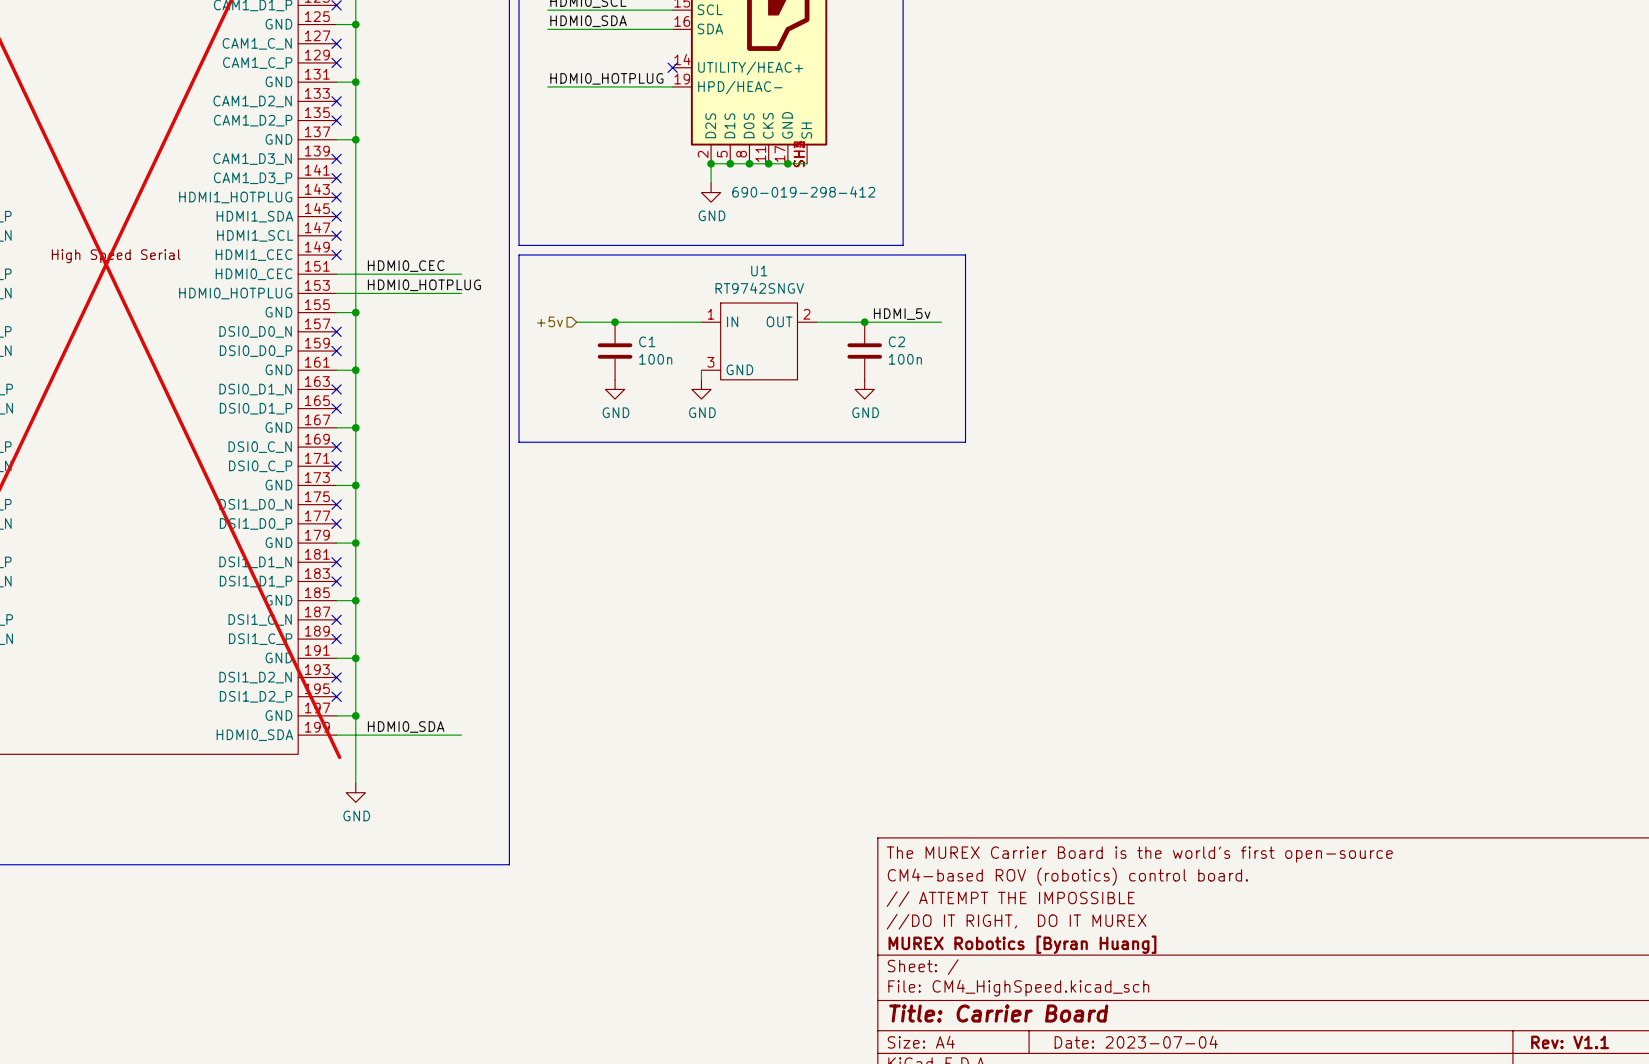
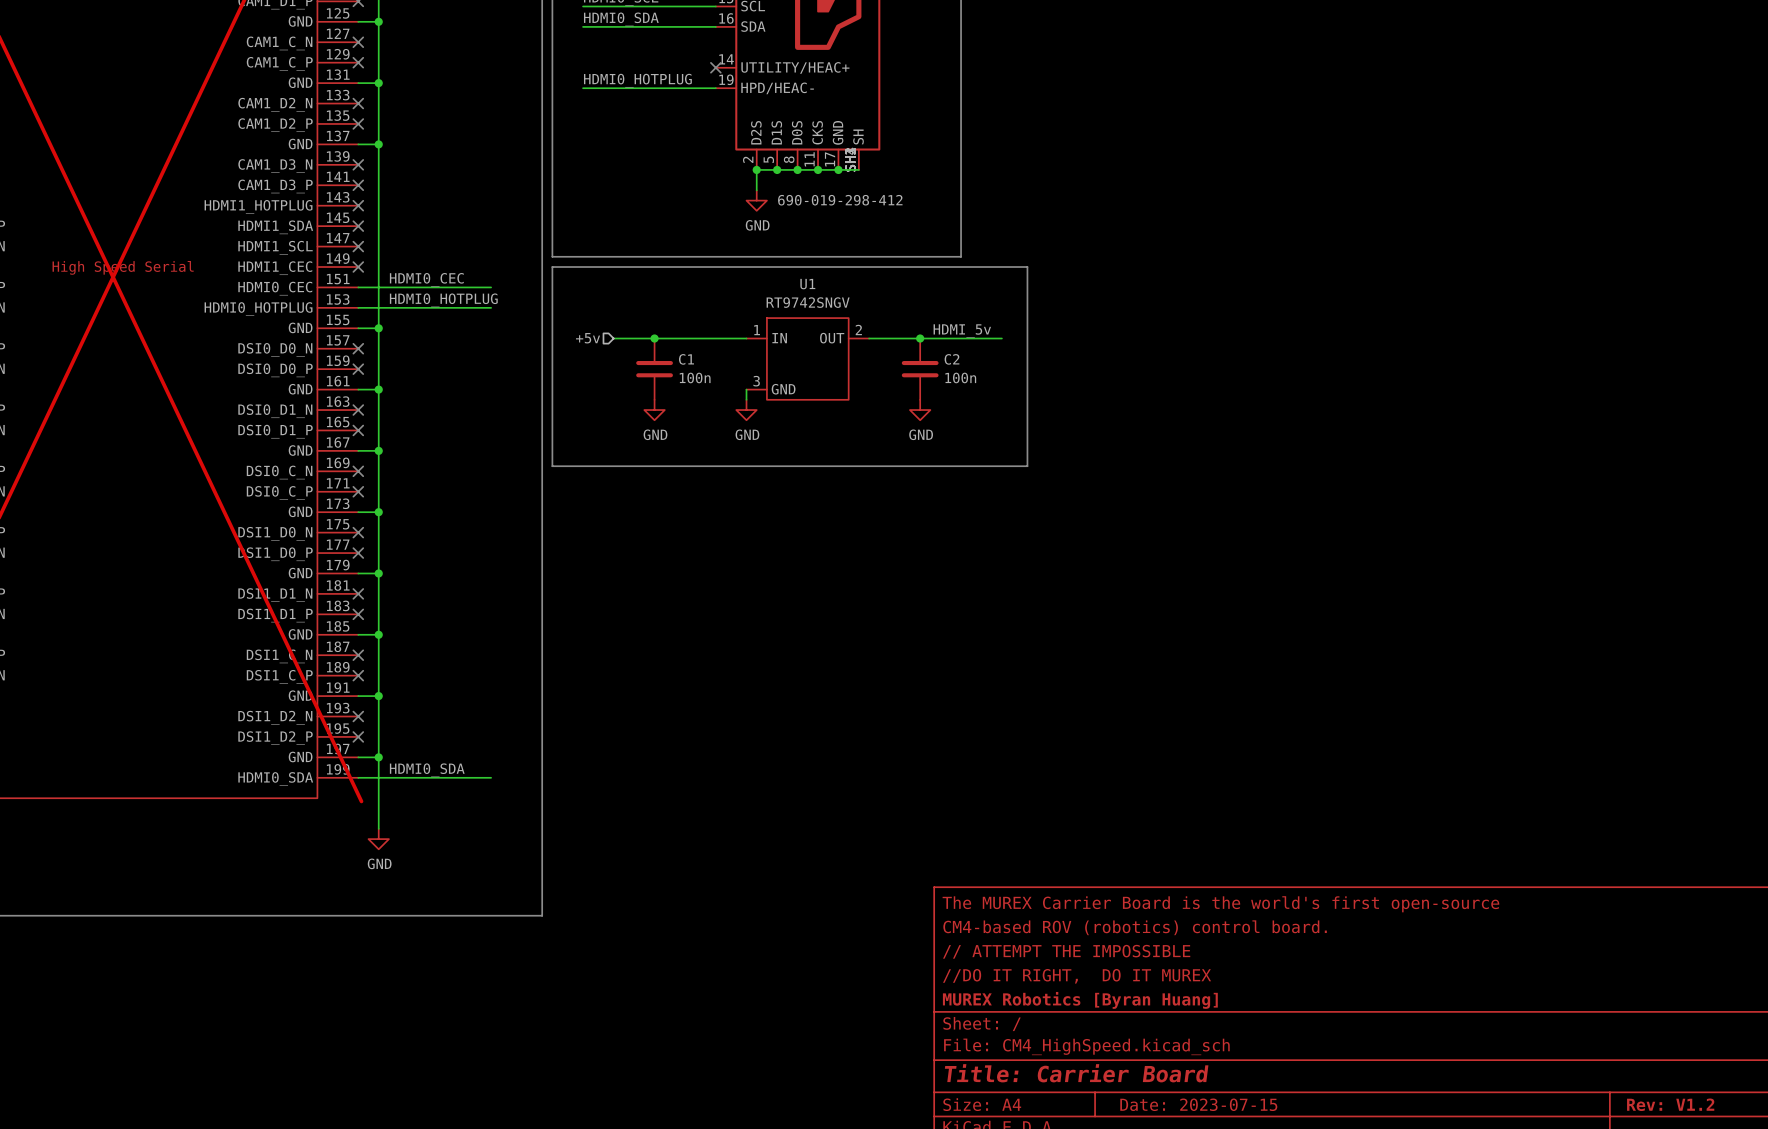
title block: Date: 2023-07-04 (1136, 1042) -> Date: 2023-07-15 (1198, 1104)
title block: Rev: V1.1 (1570, 1042) -> Rev: V1.2 (1670, 1104)

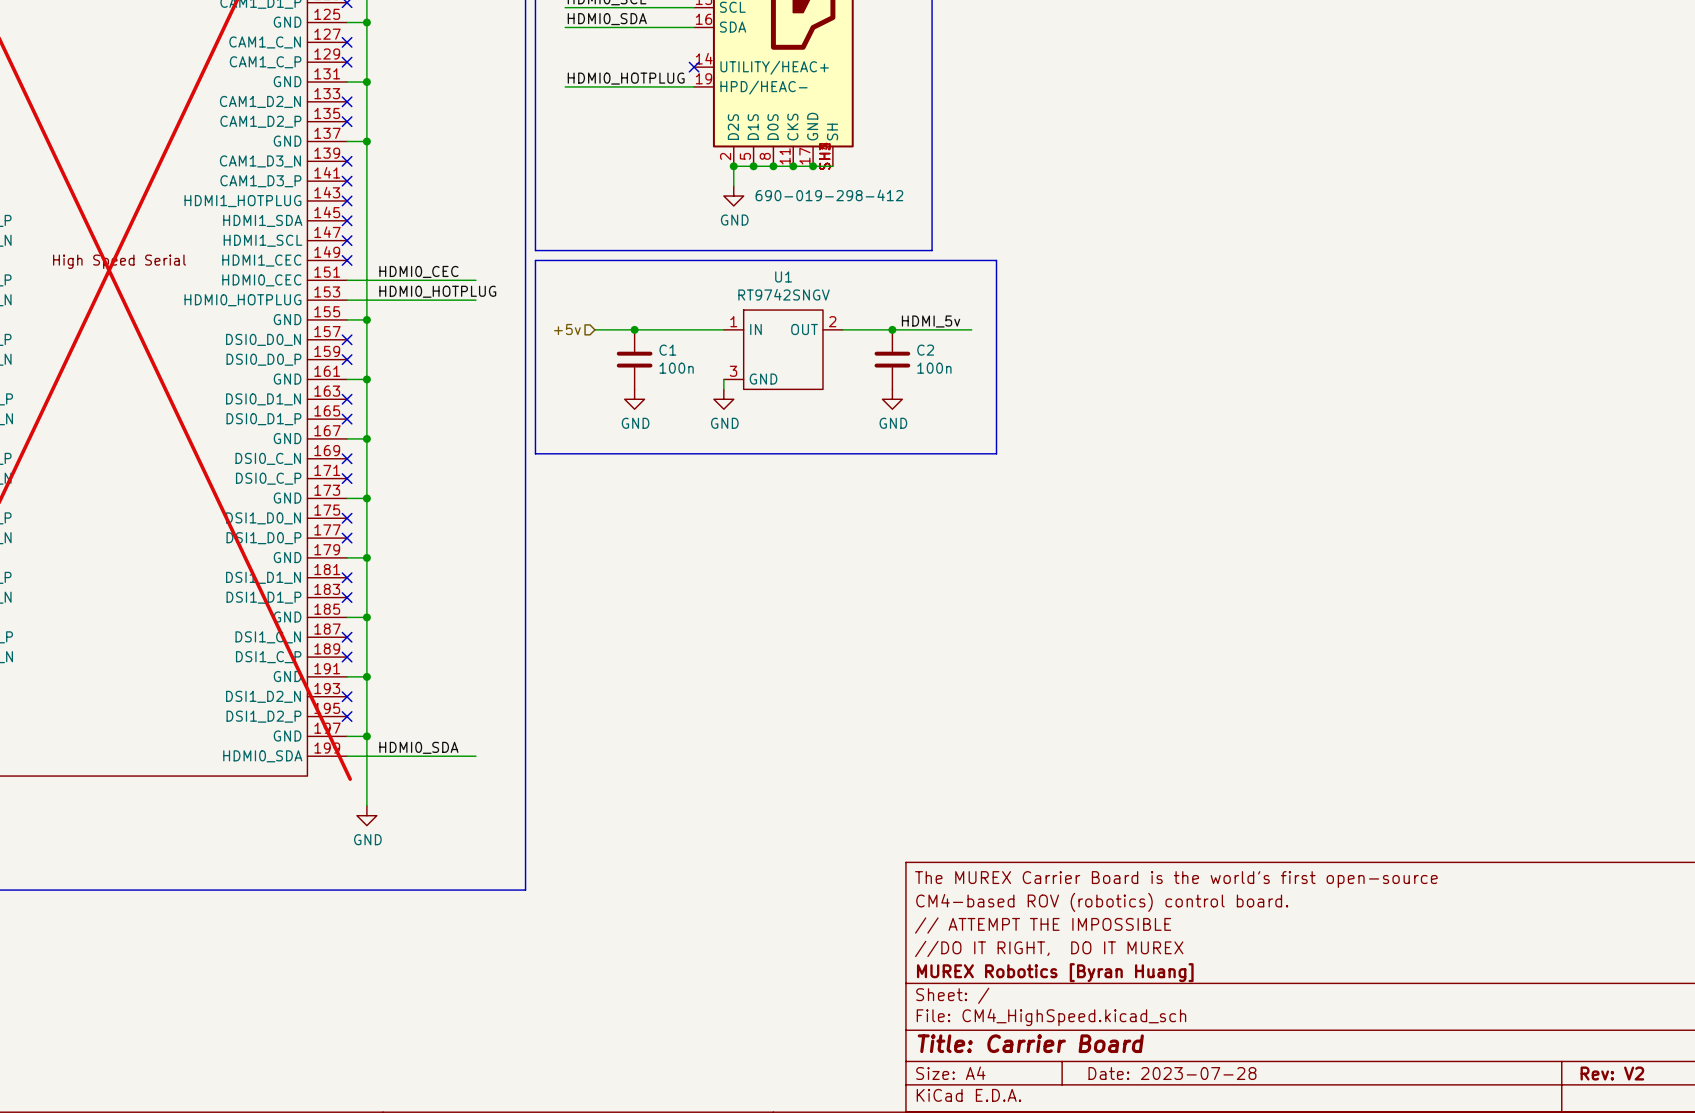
title block: Date: 2023-07-15 (1198, 1104) -> Date: 2023-07-28 (1172, 1073)
title block: Rev: V1.2 (1670, 1104) -> Rev: V2 (1612, 1073)

